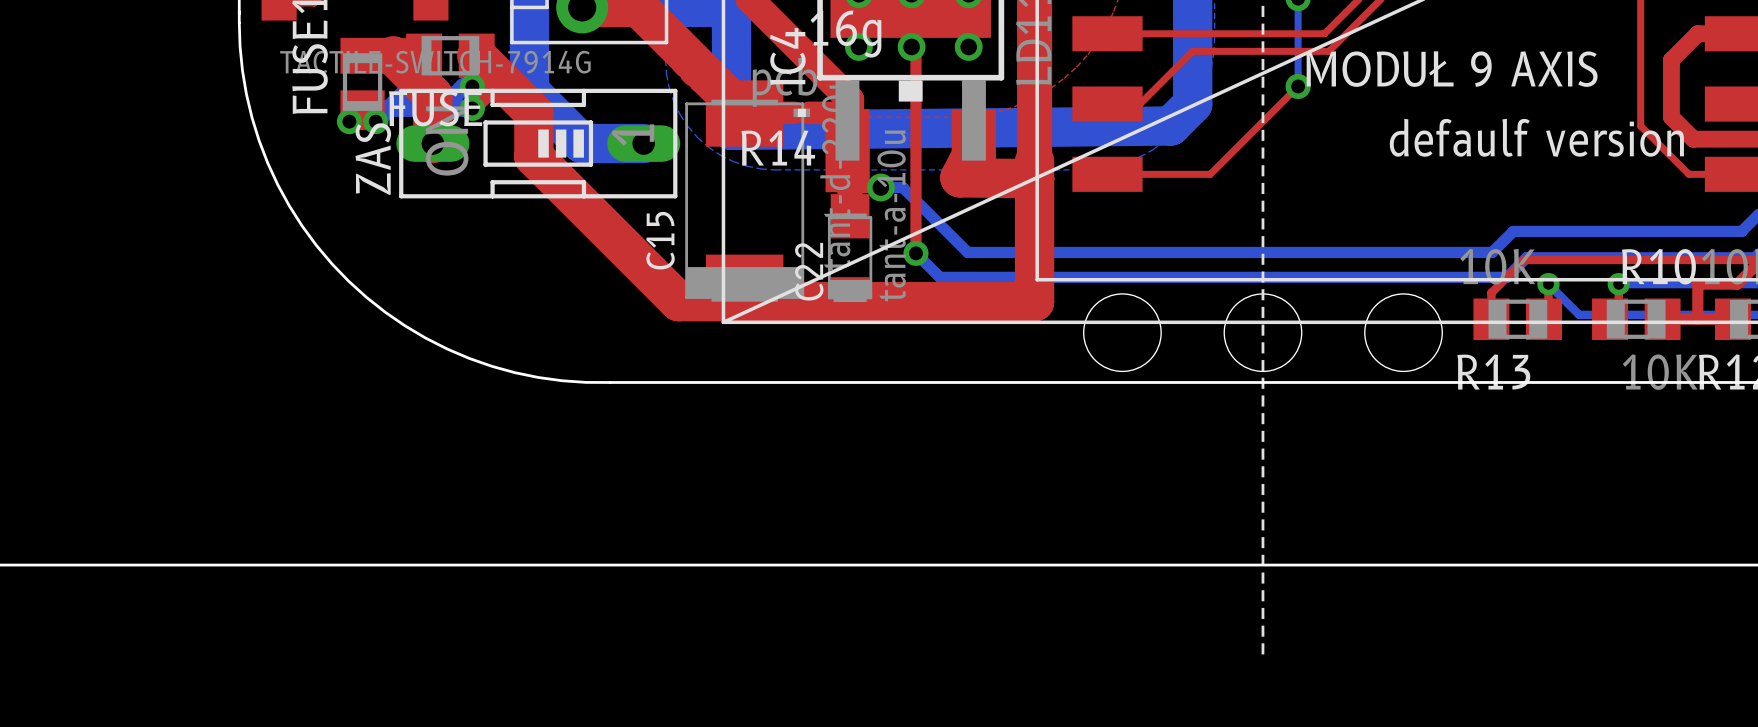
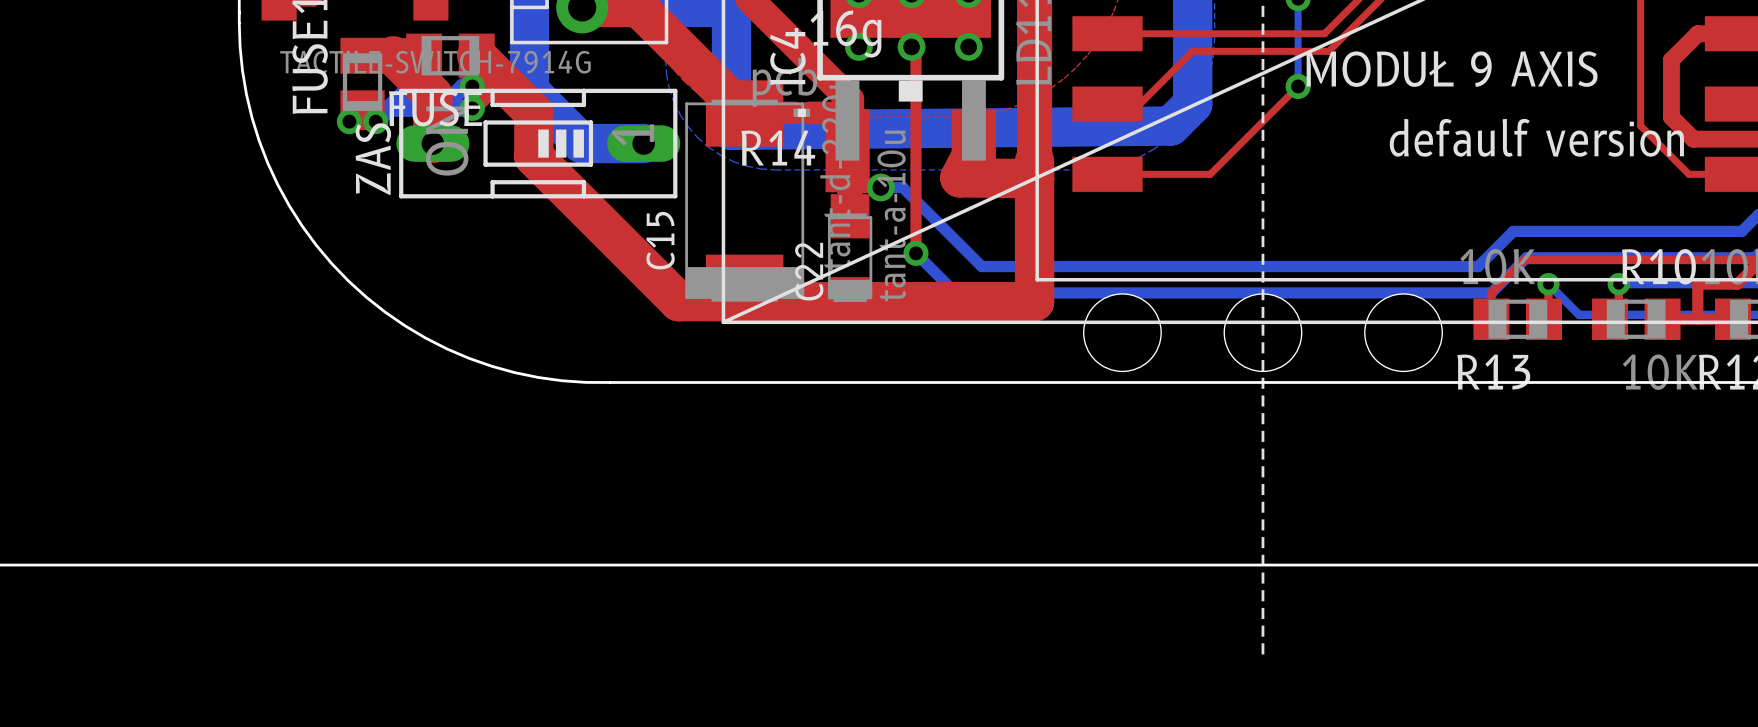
bottom track: (967, 252) (1492, 252) -> (967, 252) (981, 266) (1478, 266) (1492, 252)
bottom track: (939, 277) (1506, 277) -> (939, 277) (955, 292) (1491, 292) (1506, 277)

